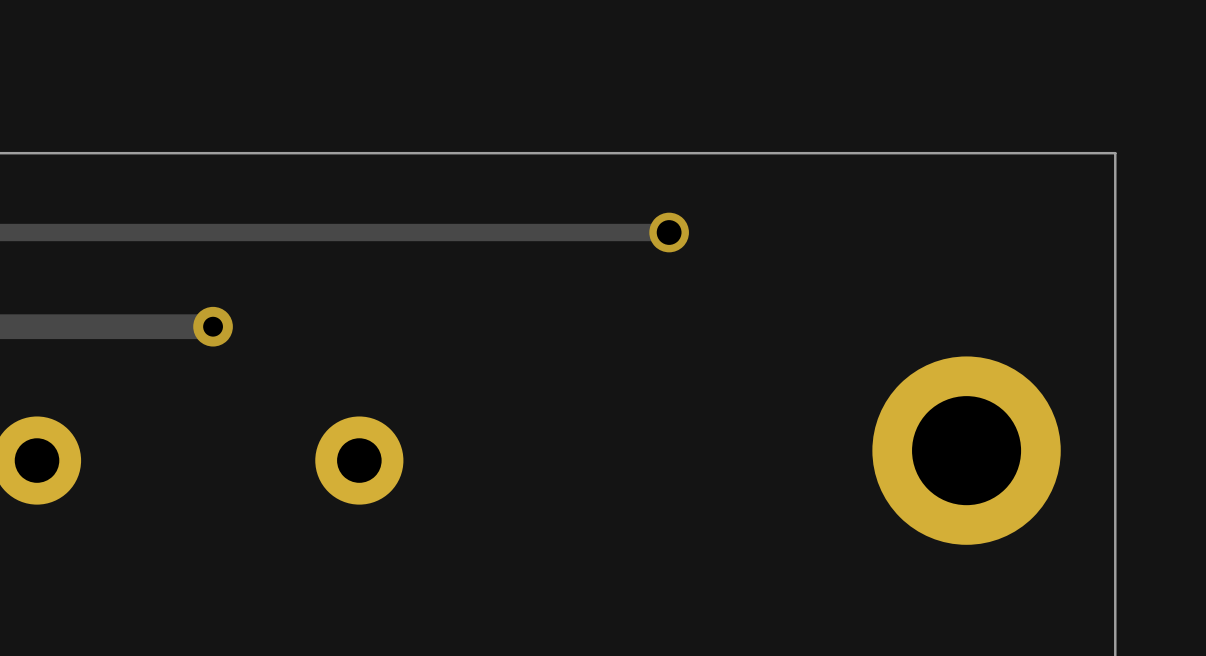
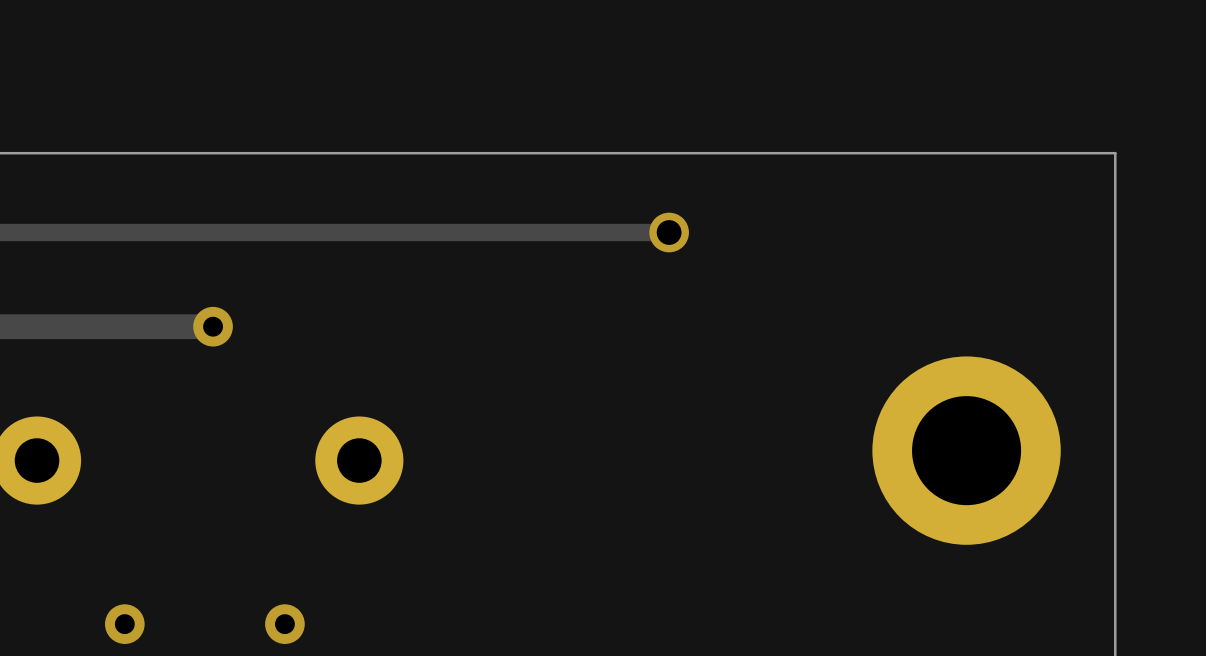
via: none -> (124, 624)
via: none -> (284, 624)

